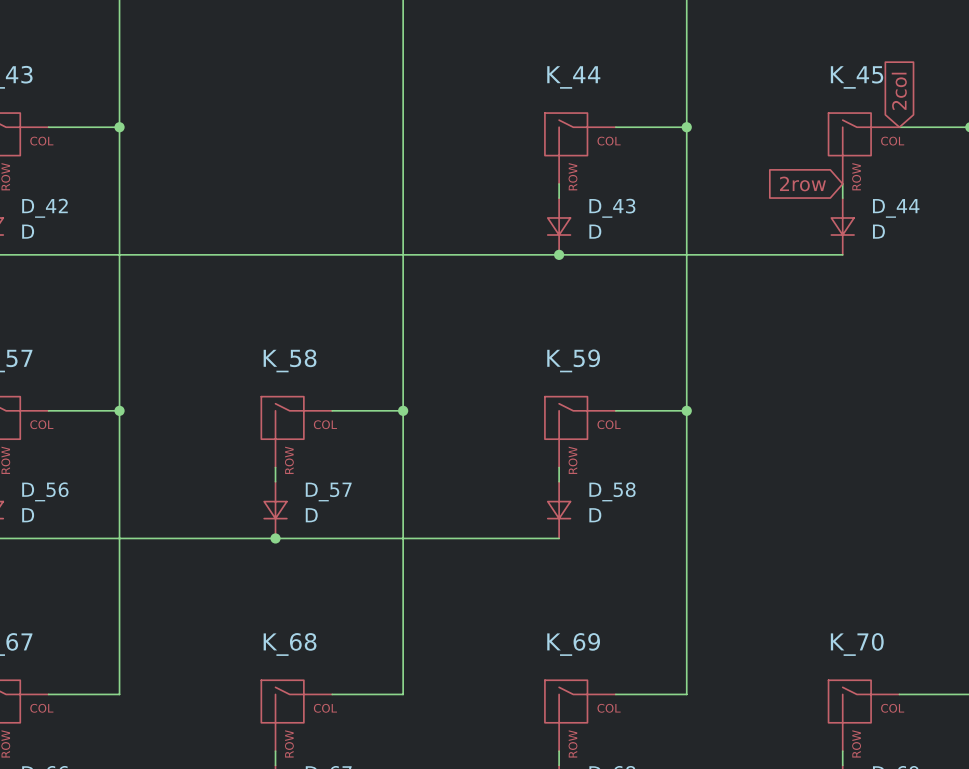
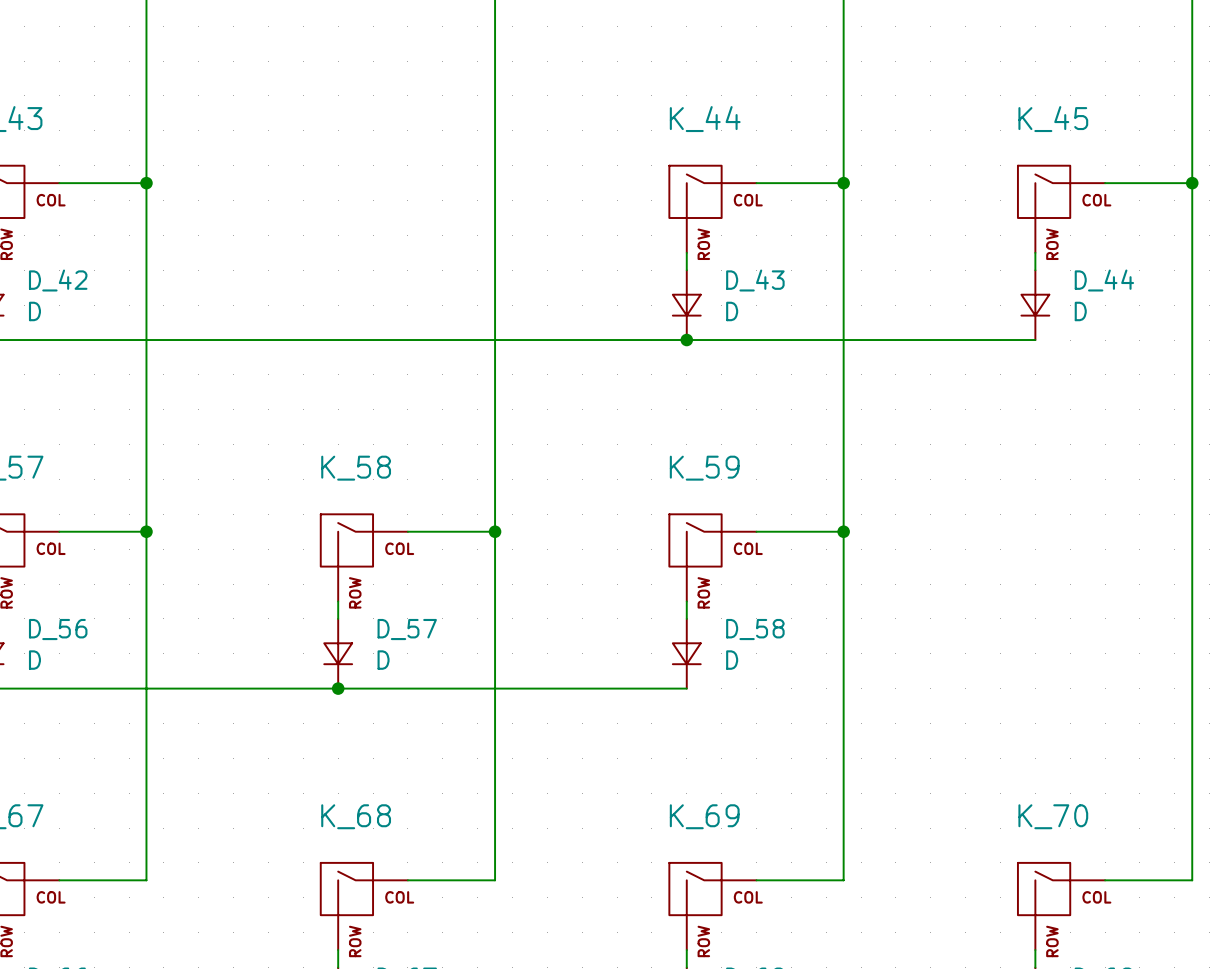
global label: 2col (899, 91) -> none
global label: 2row (802, 183) -> none

